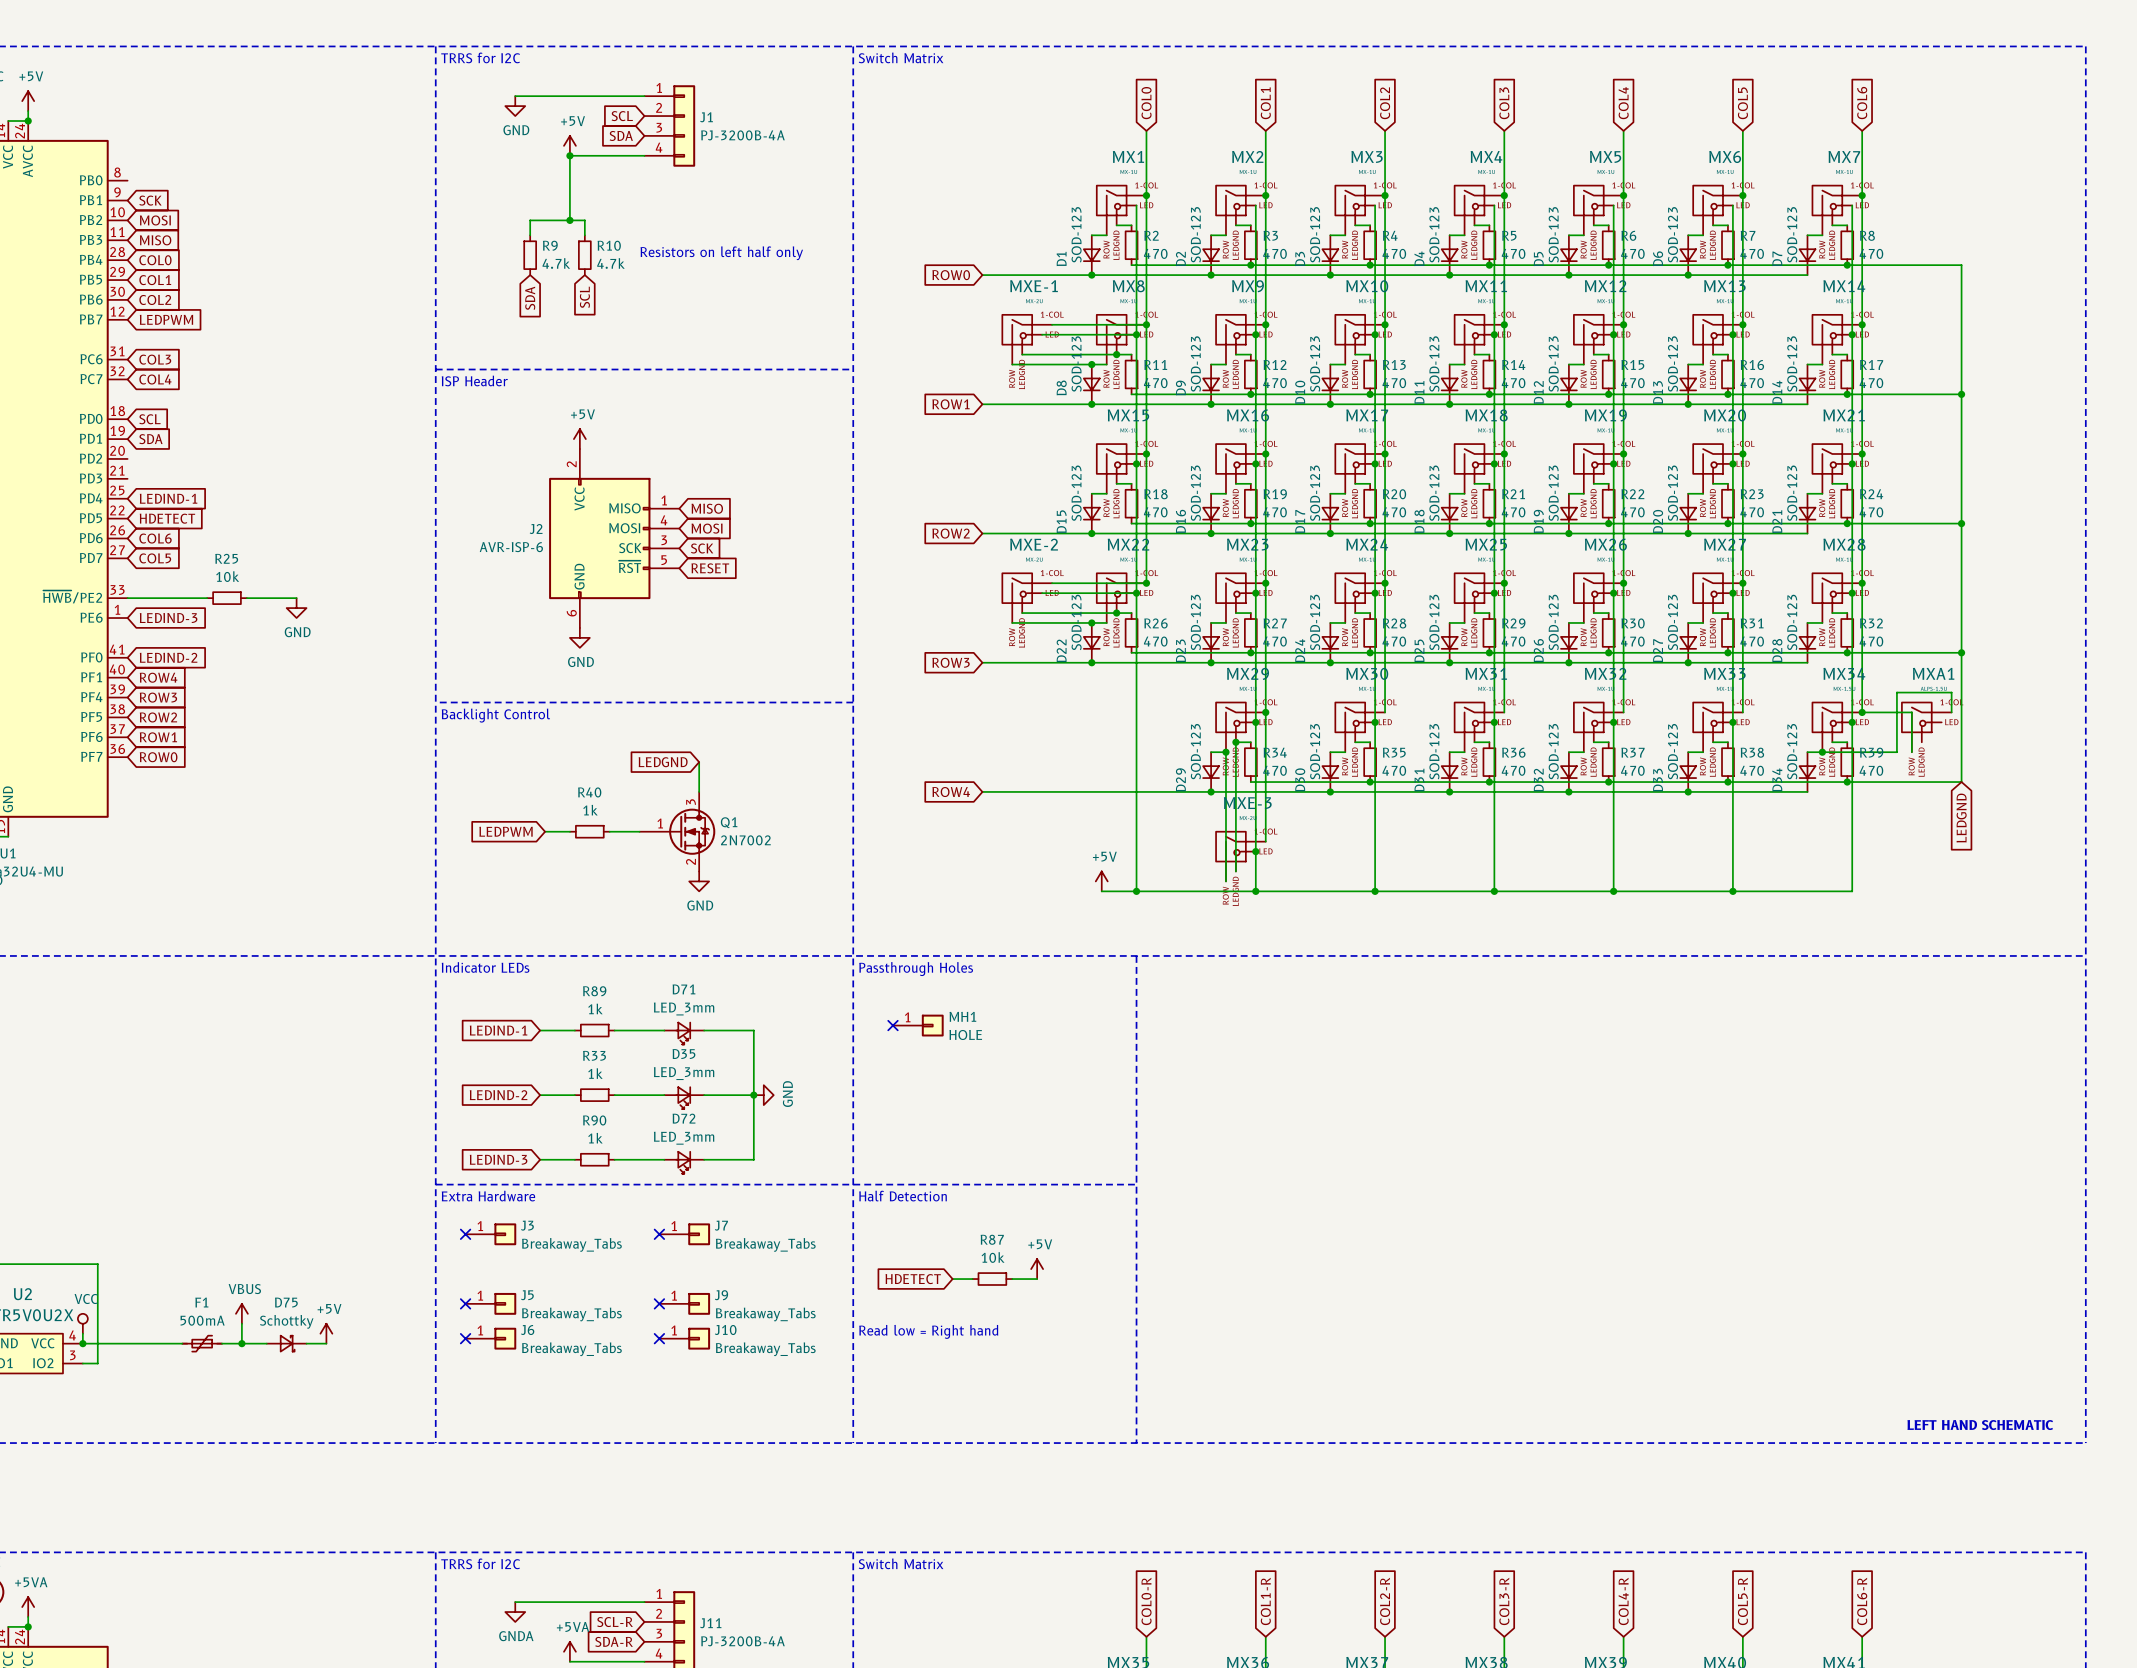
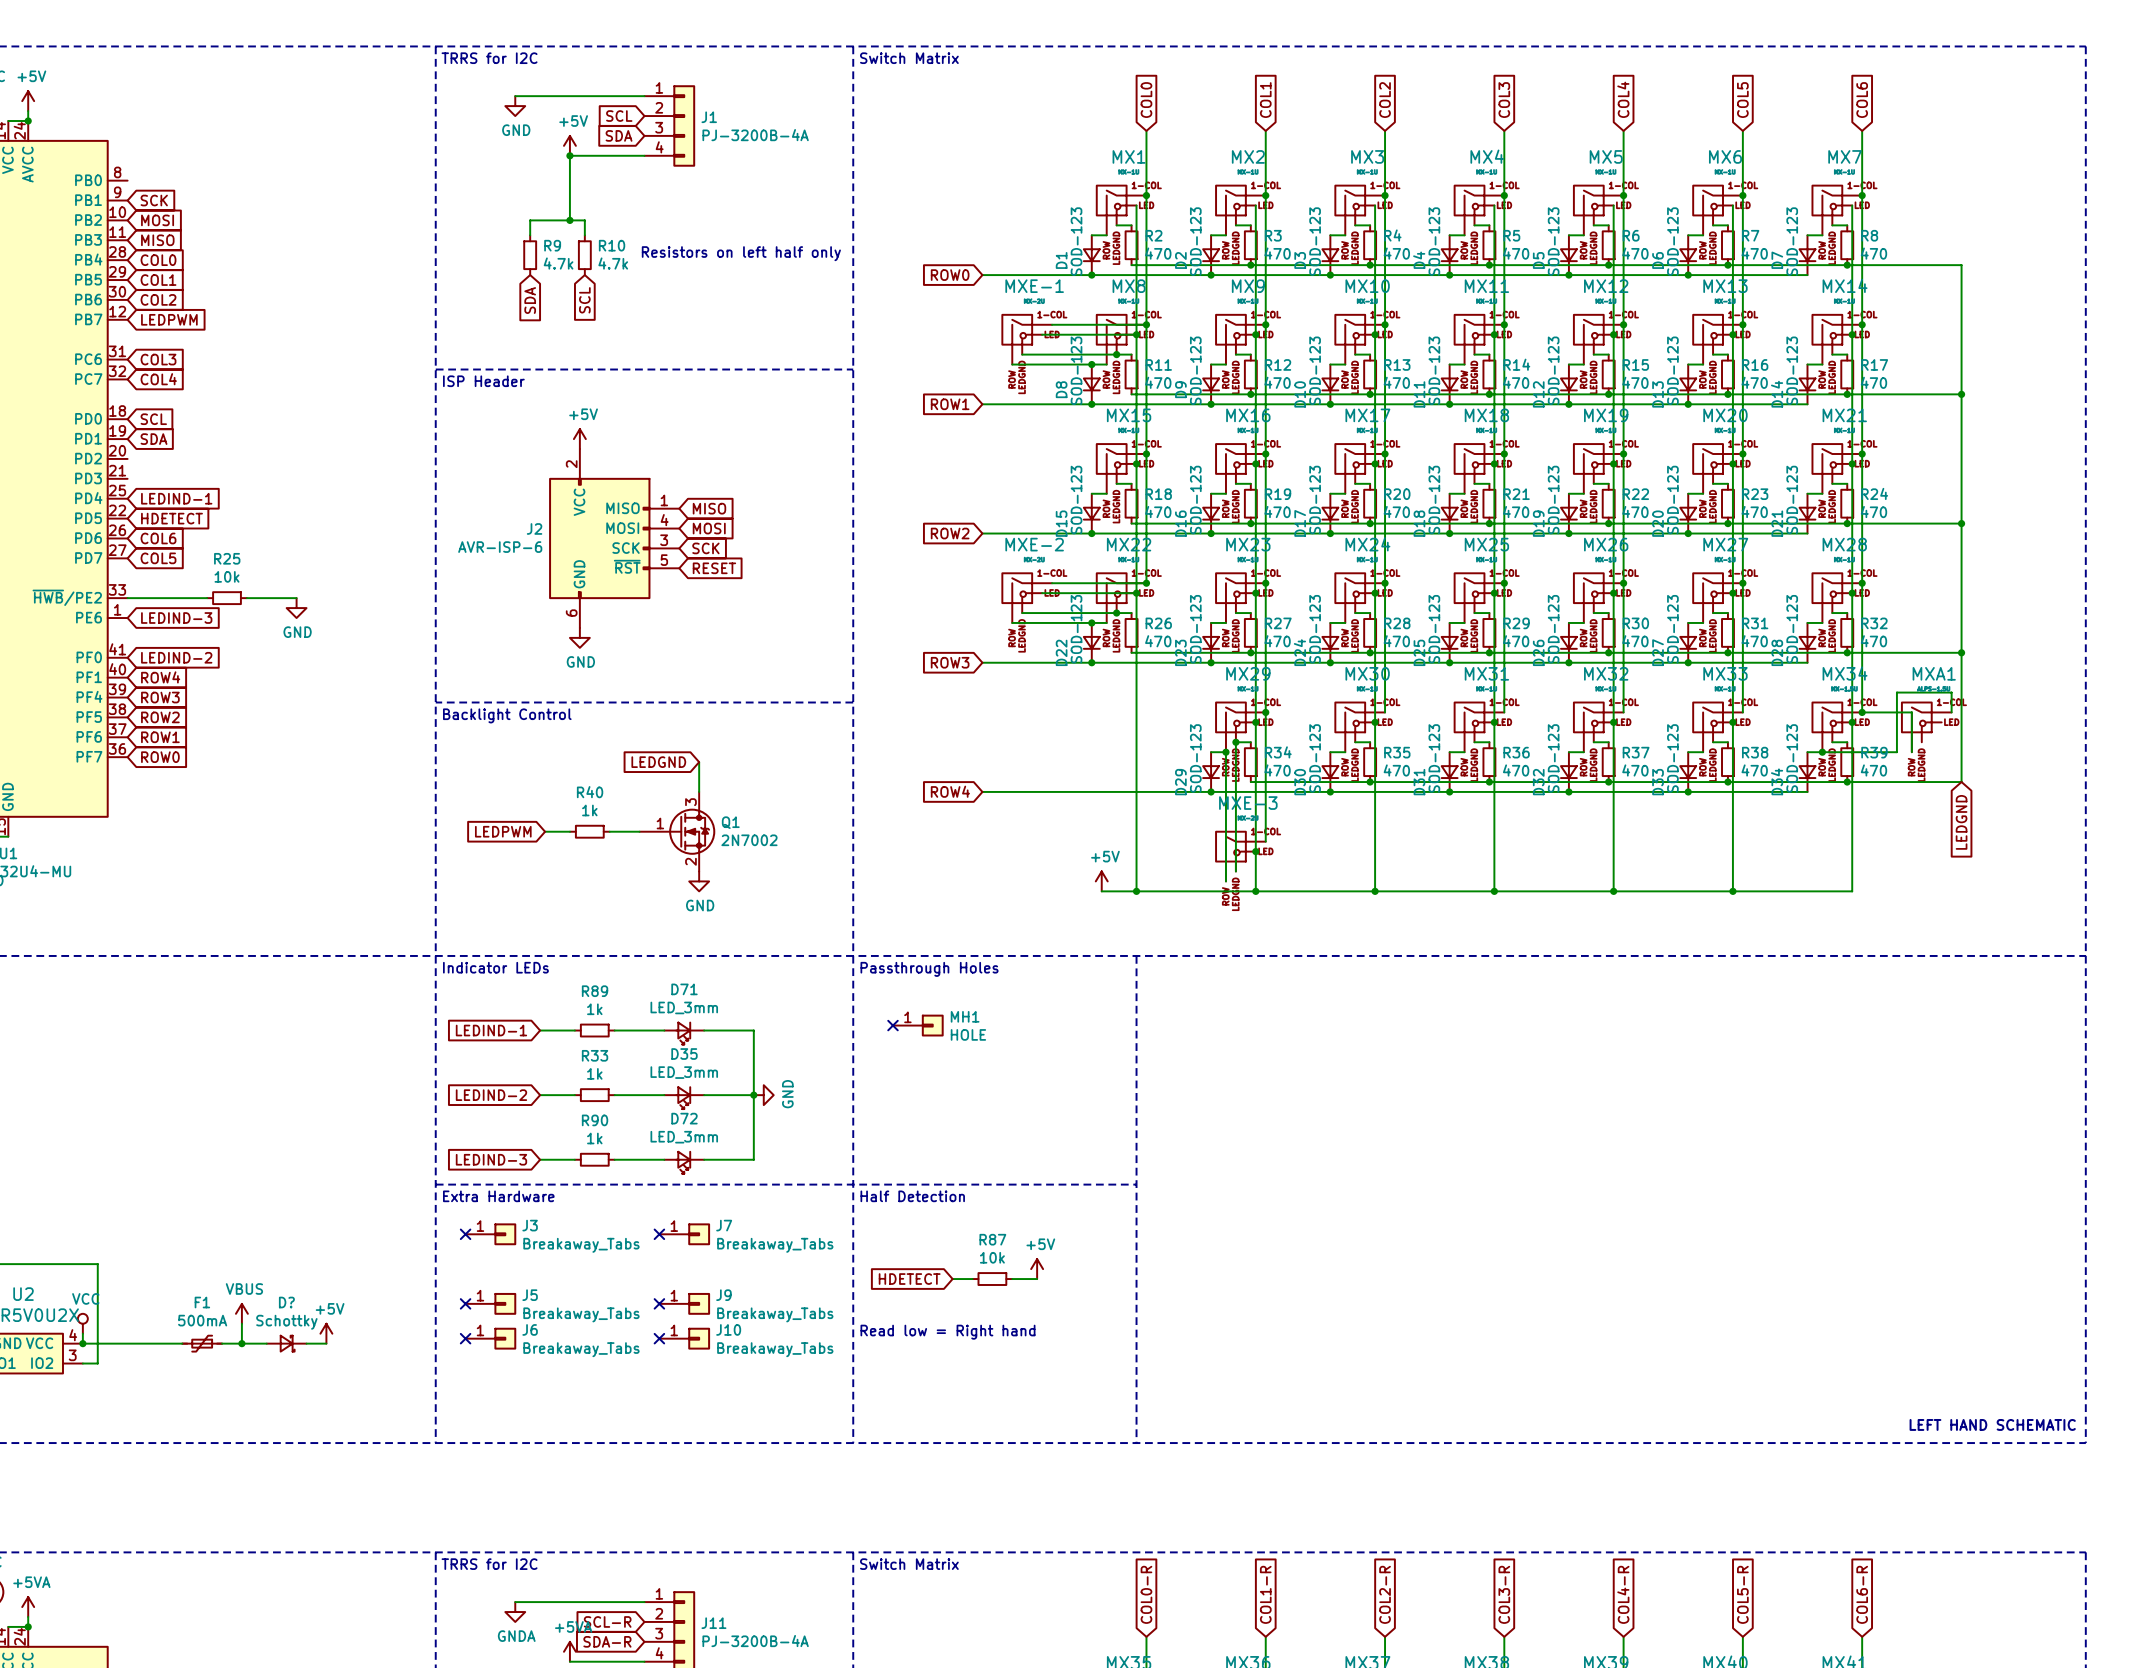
D75 name: D75 (286, 1302) -> D? (286, 1302)

